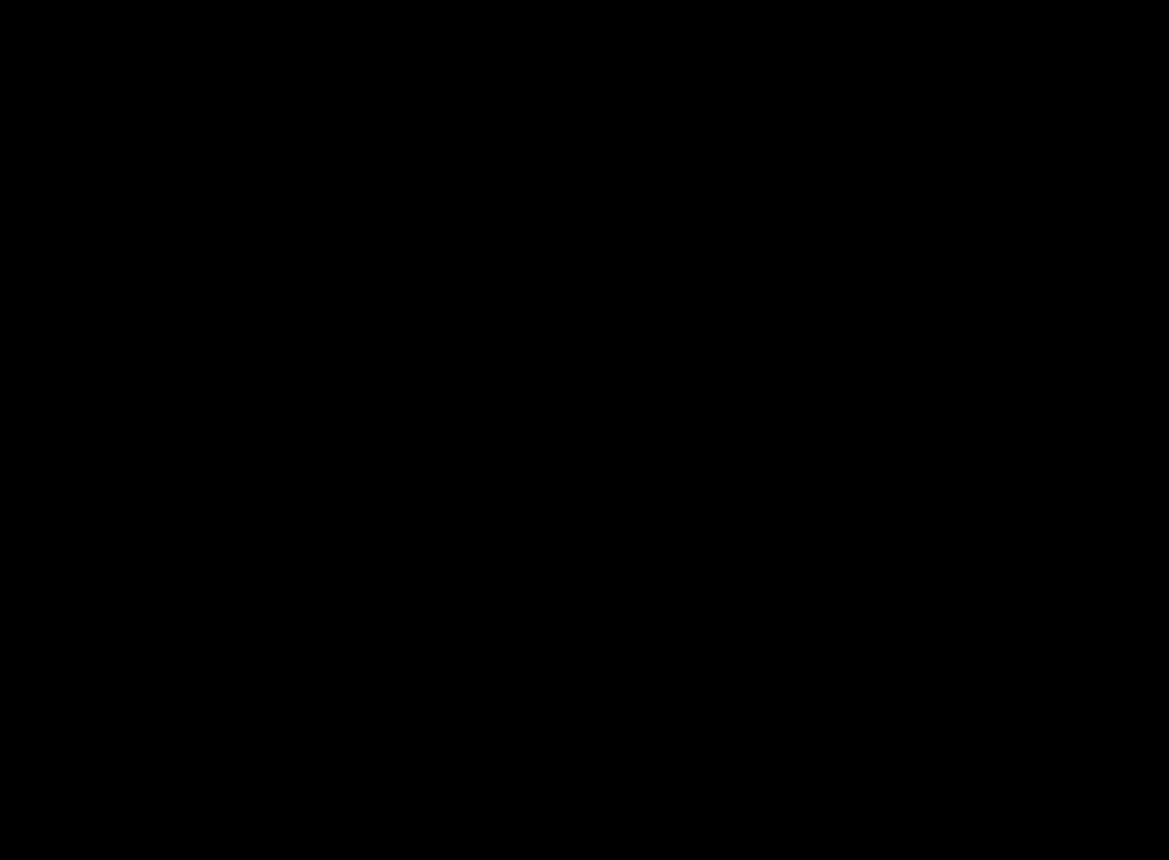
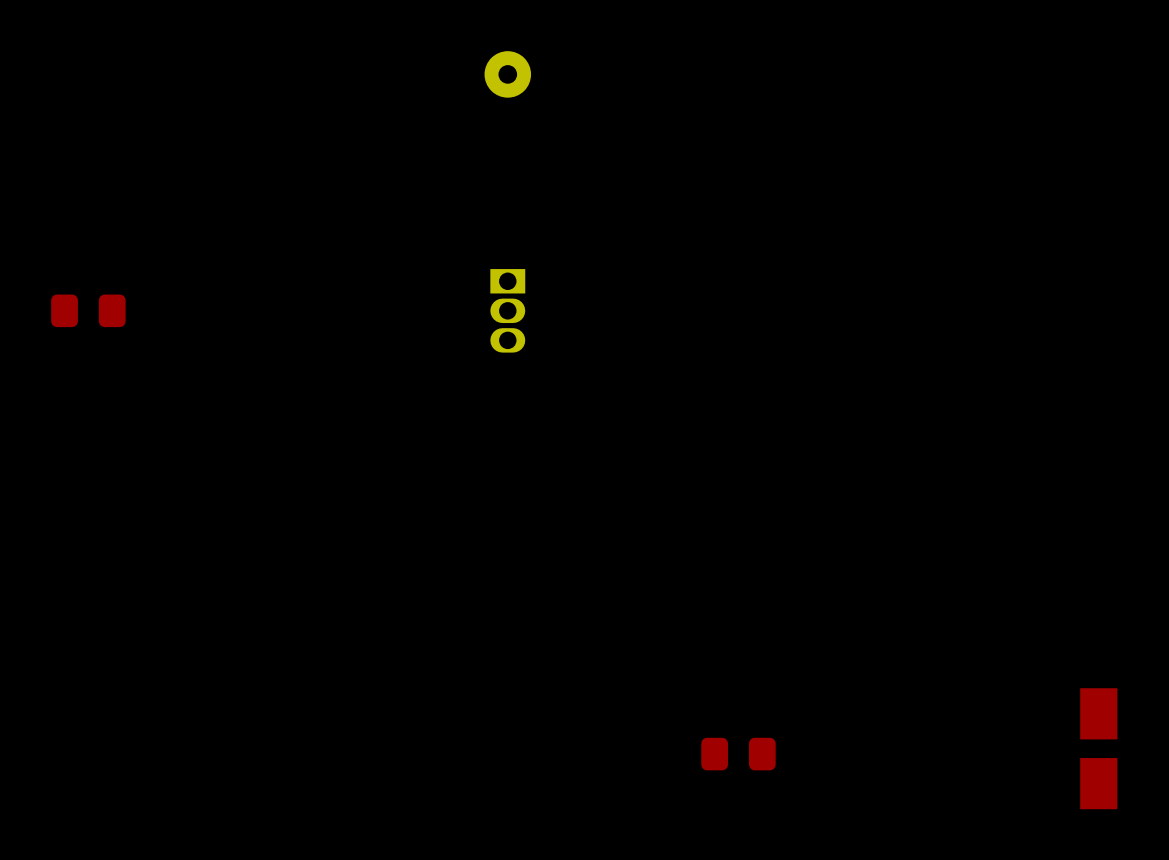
part: none -> (507, 74)
part: none -> (88, 310)
part: none -> (507, 310)
part: none -> (1098, 748)
part: none -> (738, 754)

